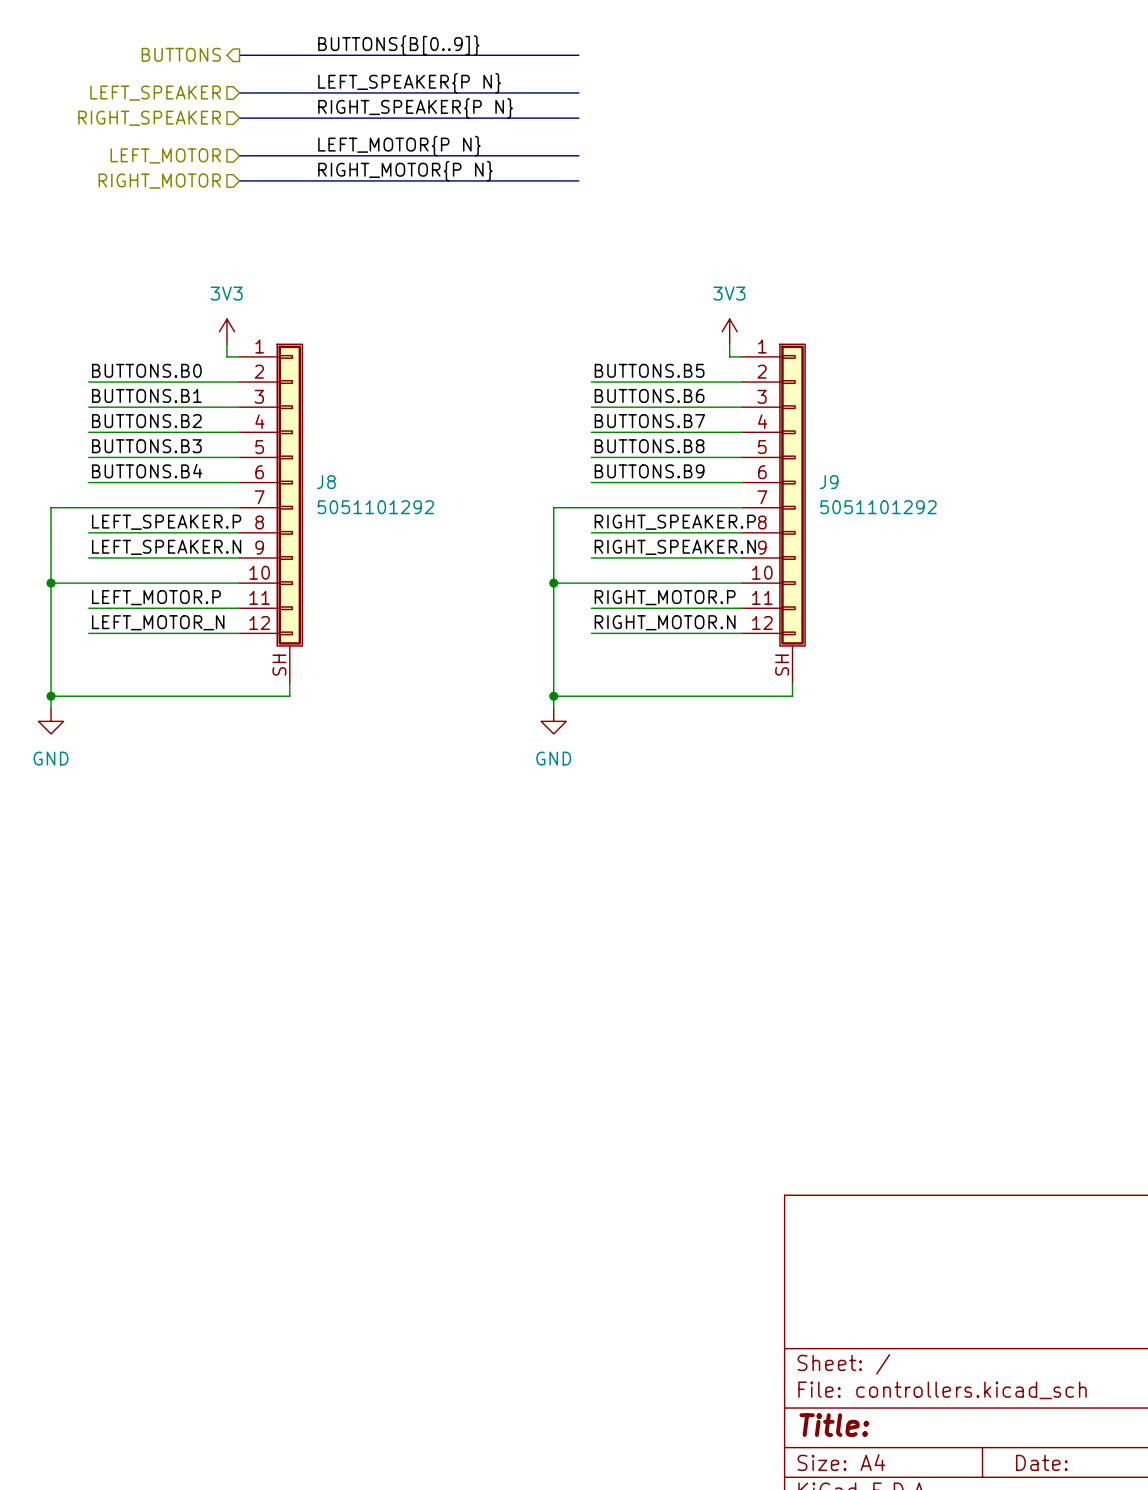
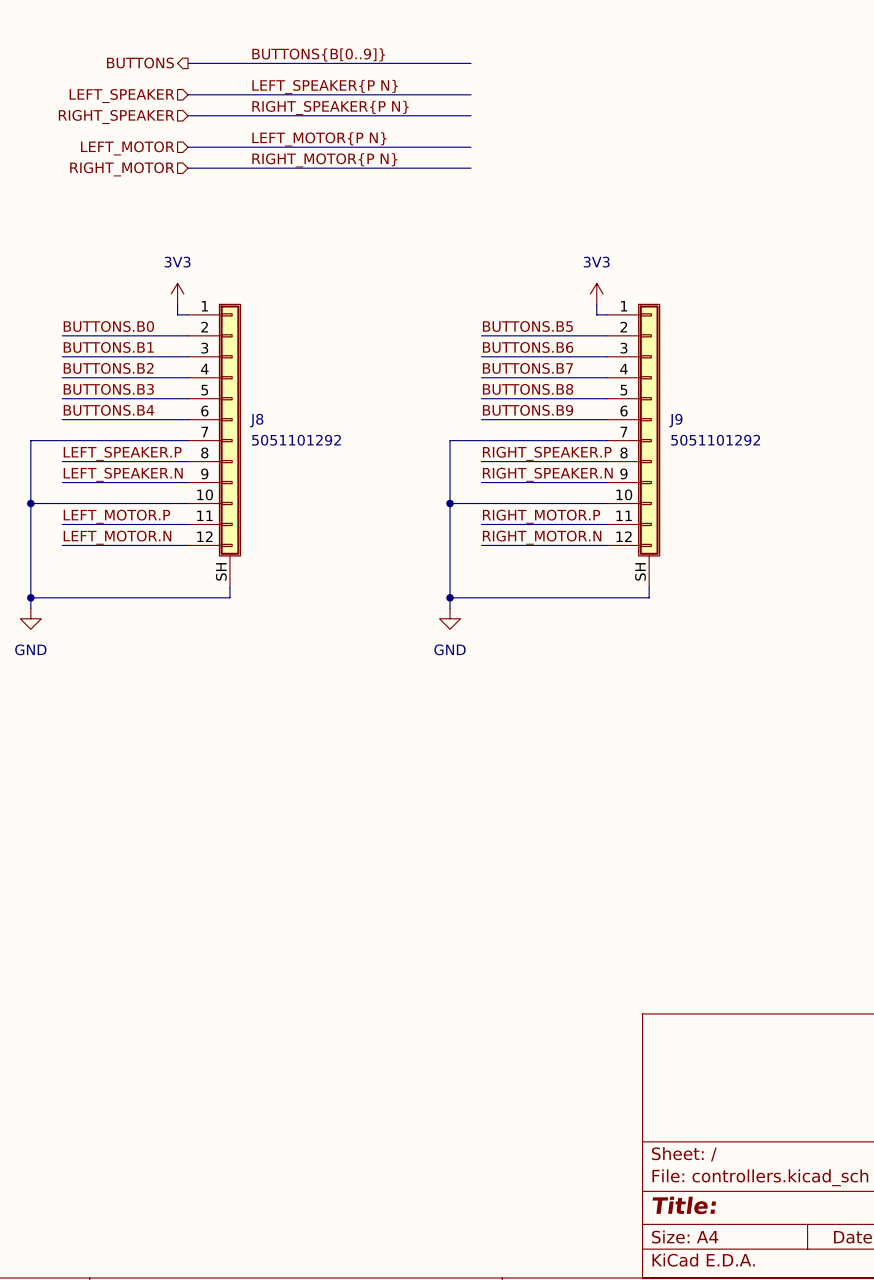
label: LEFT_MOTOR_N (158, 622) -> LEFT_MOTOR.N (117, 537)

